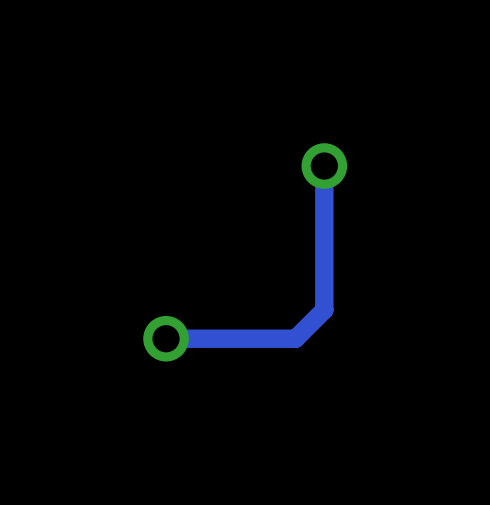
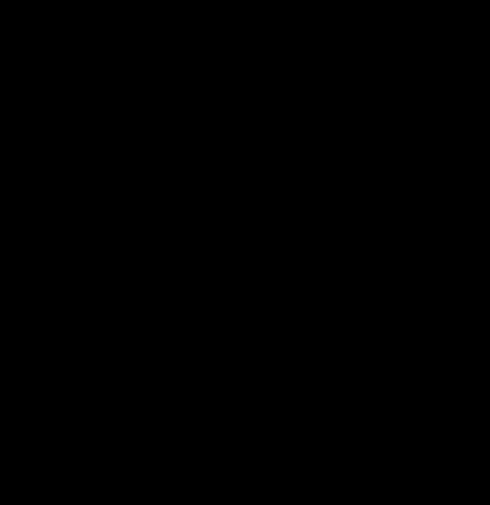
track: (324, 166) (324, 309) (295, 338) (166, 338) -> none
via: (324, 166) -> none
via: (166, 338) -> none

